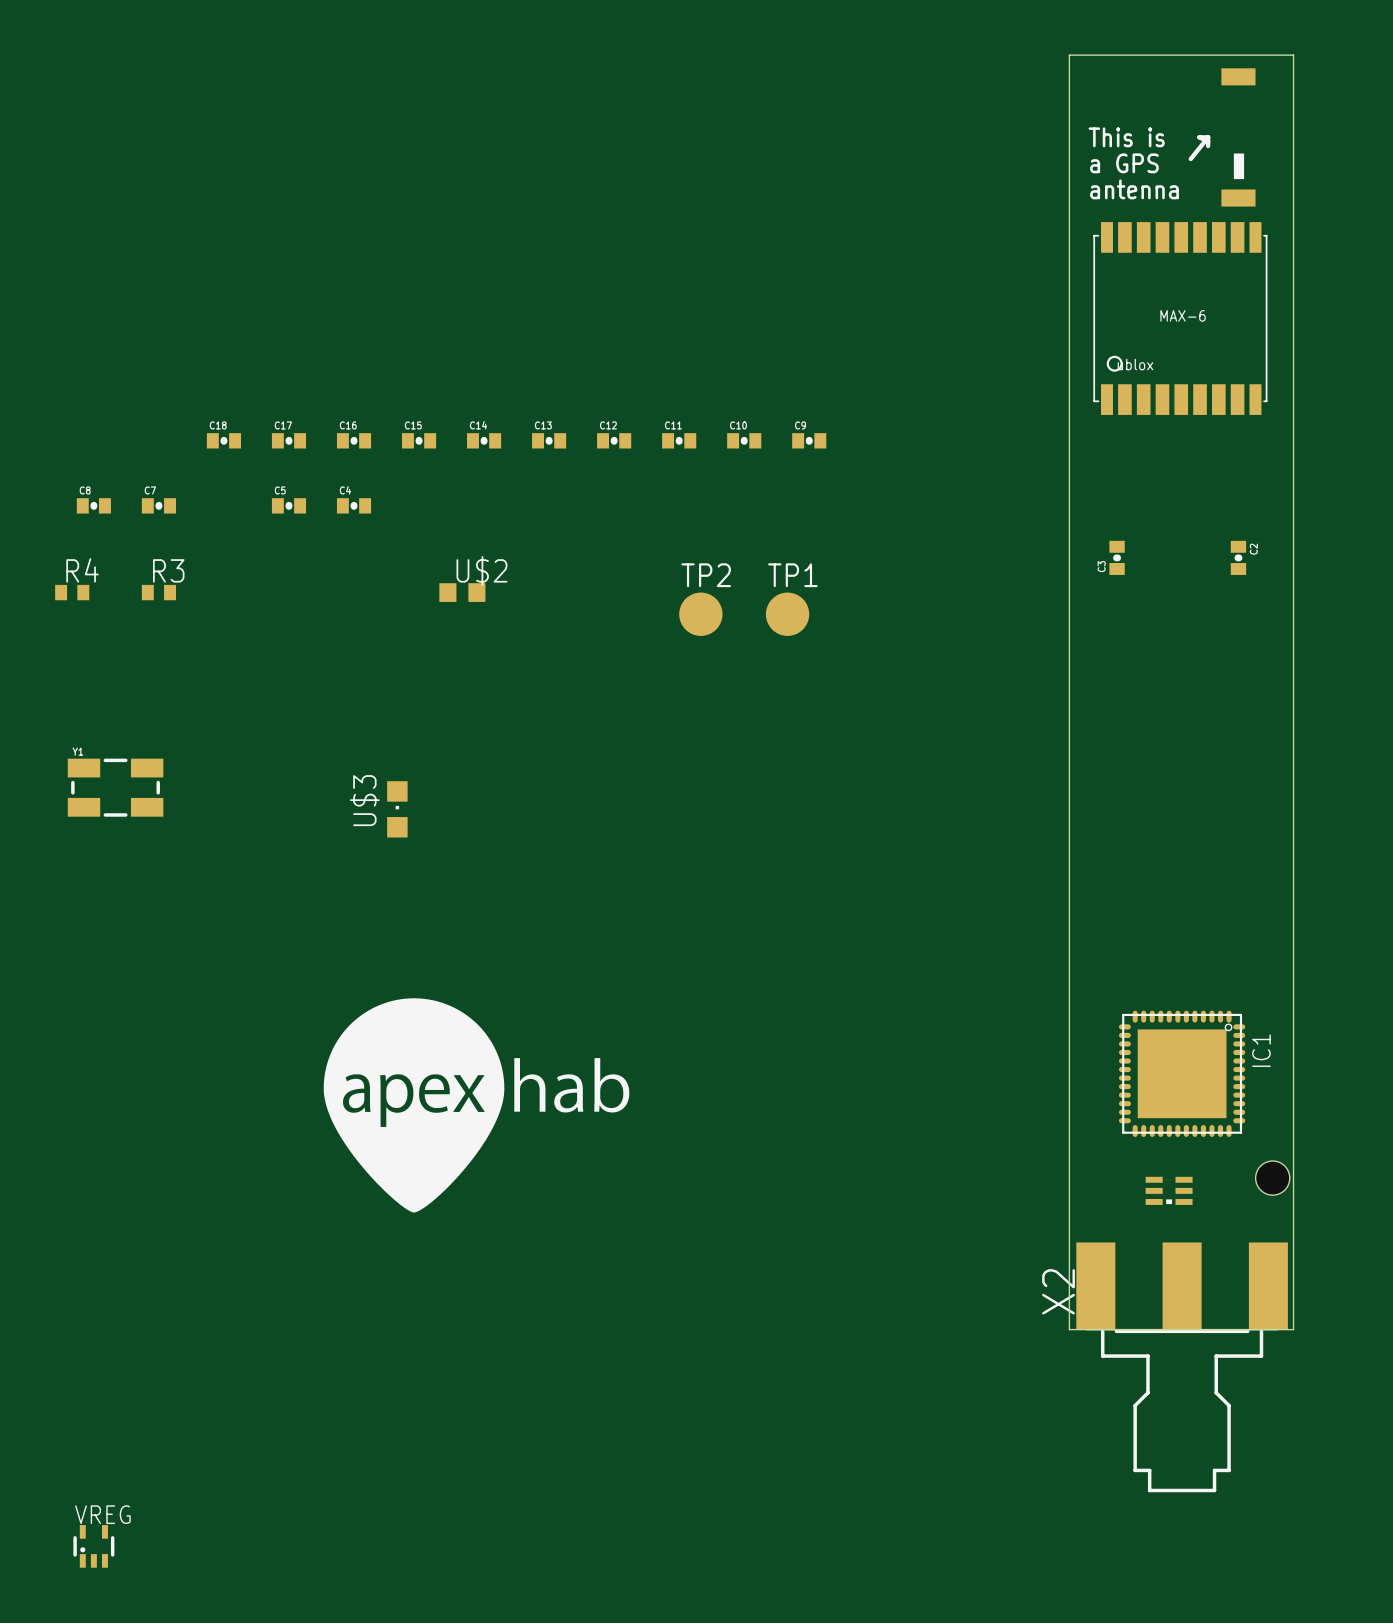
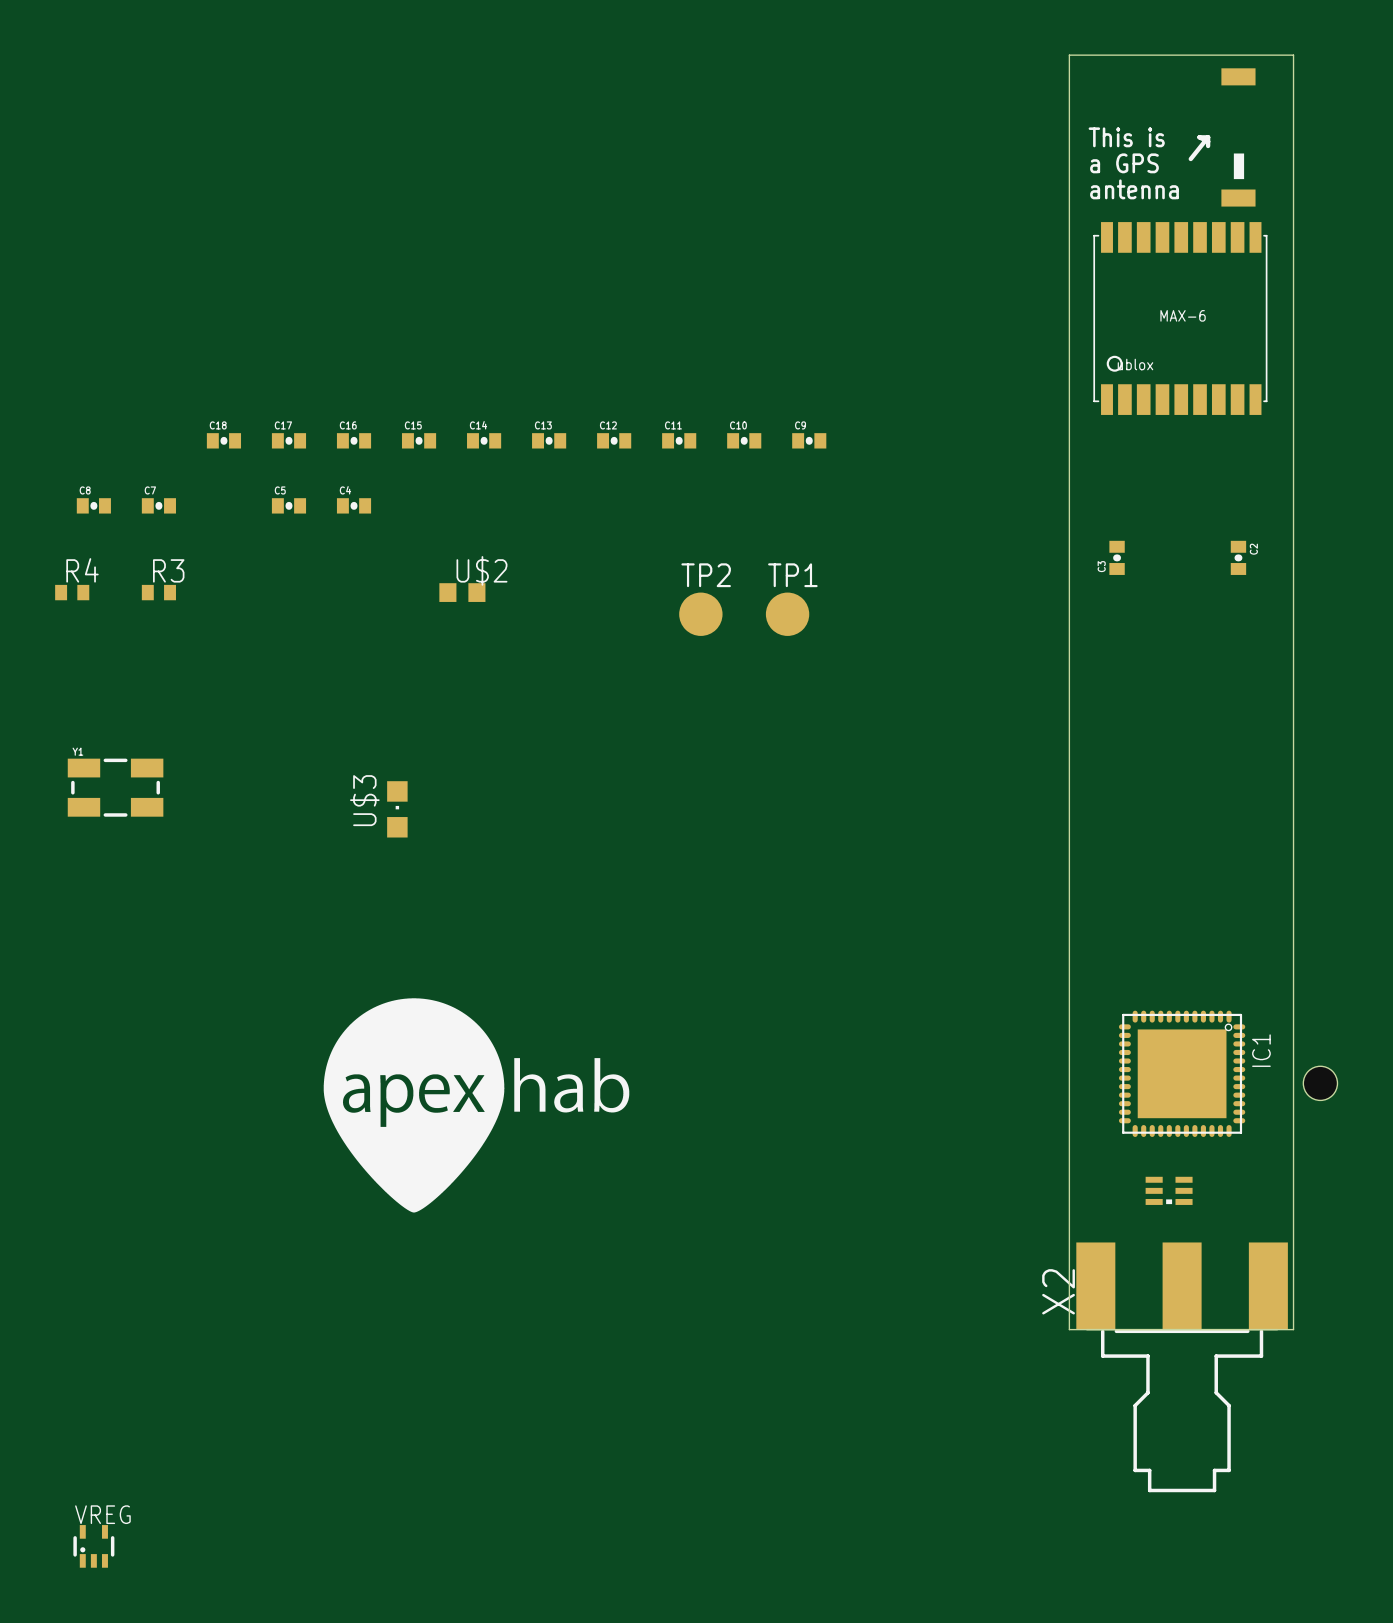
part position: (1272, 1178) -> (1320, 1083)

